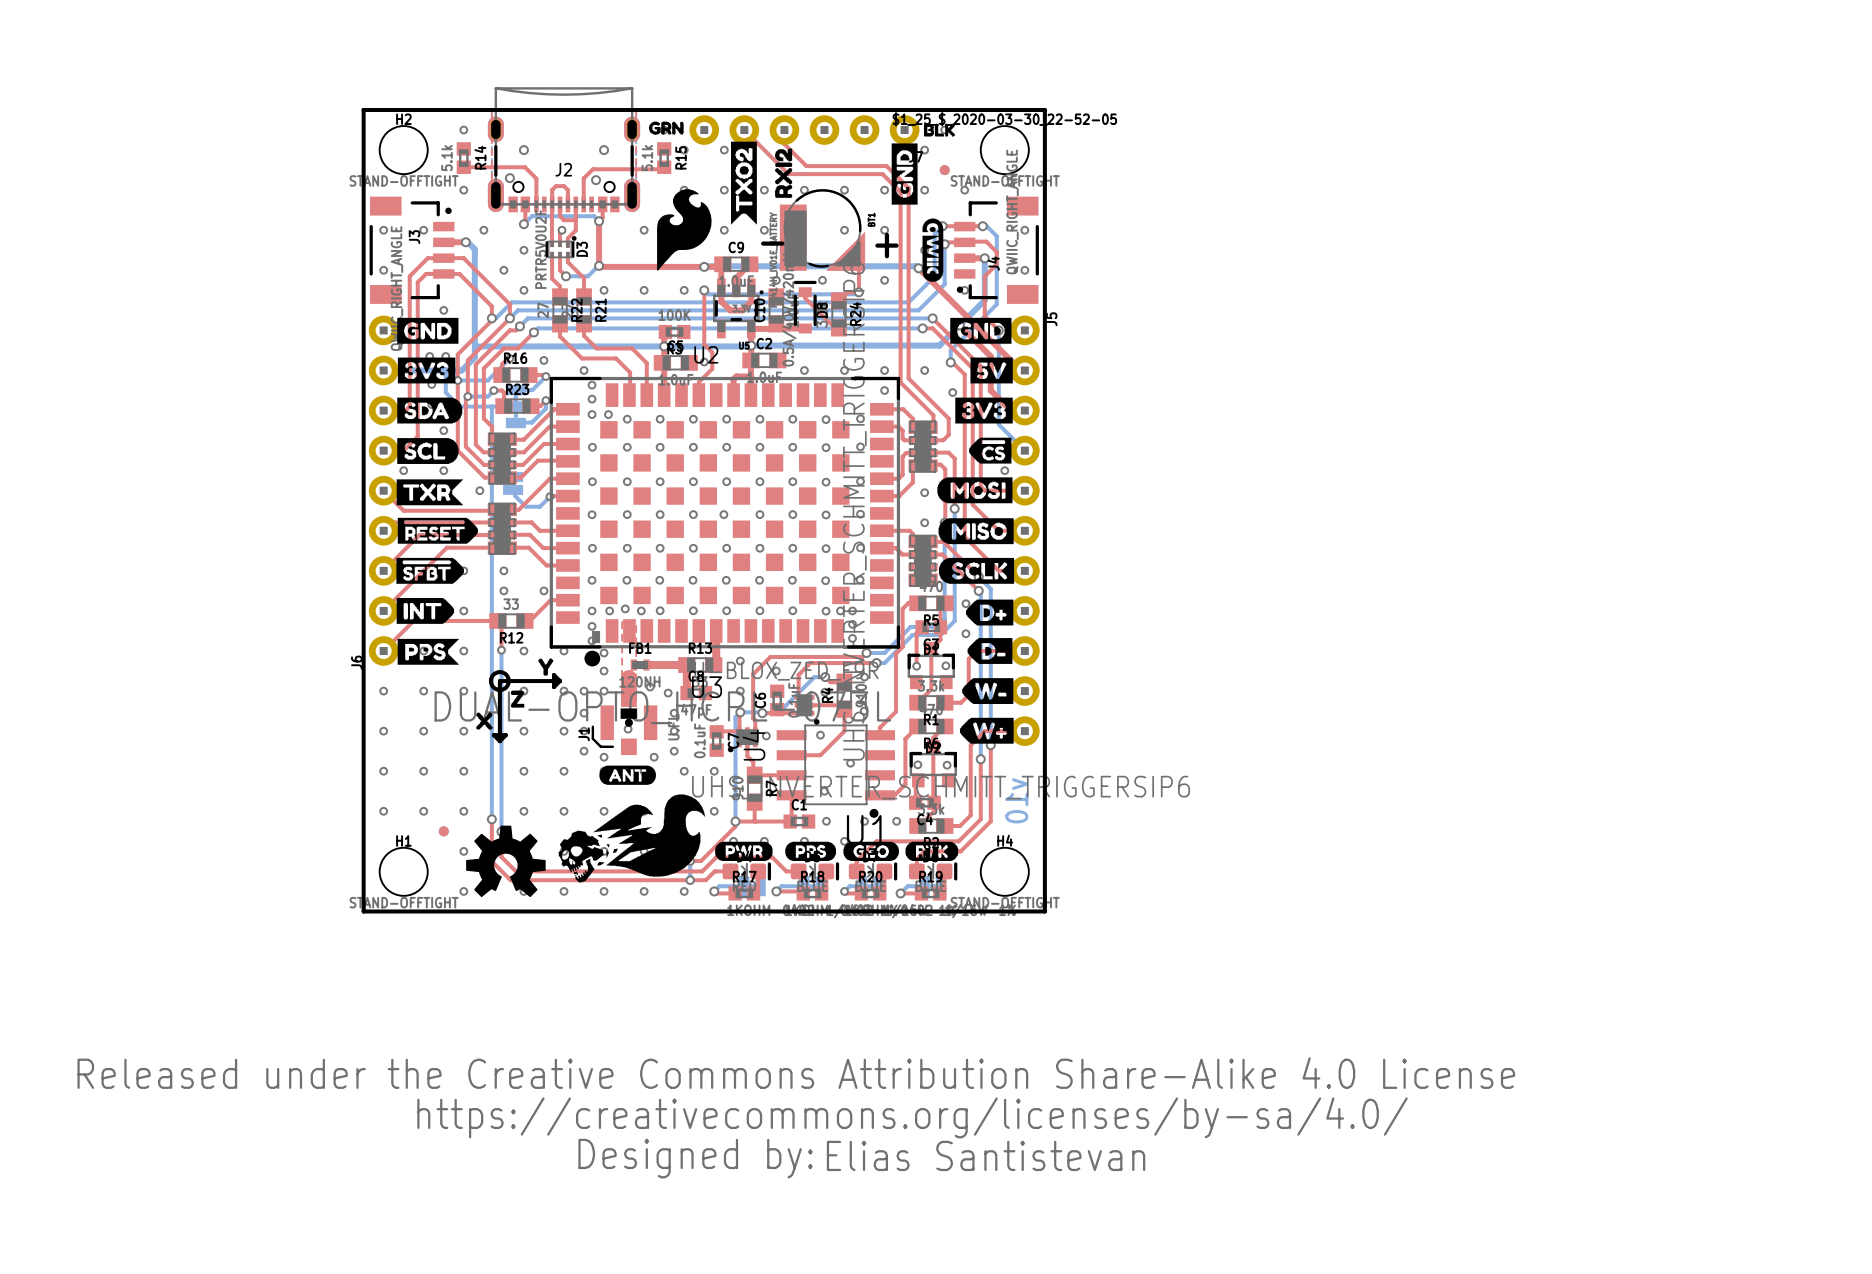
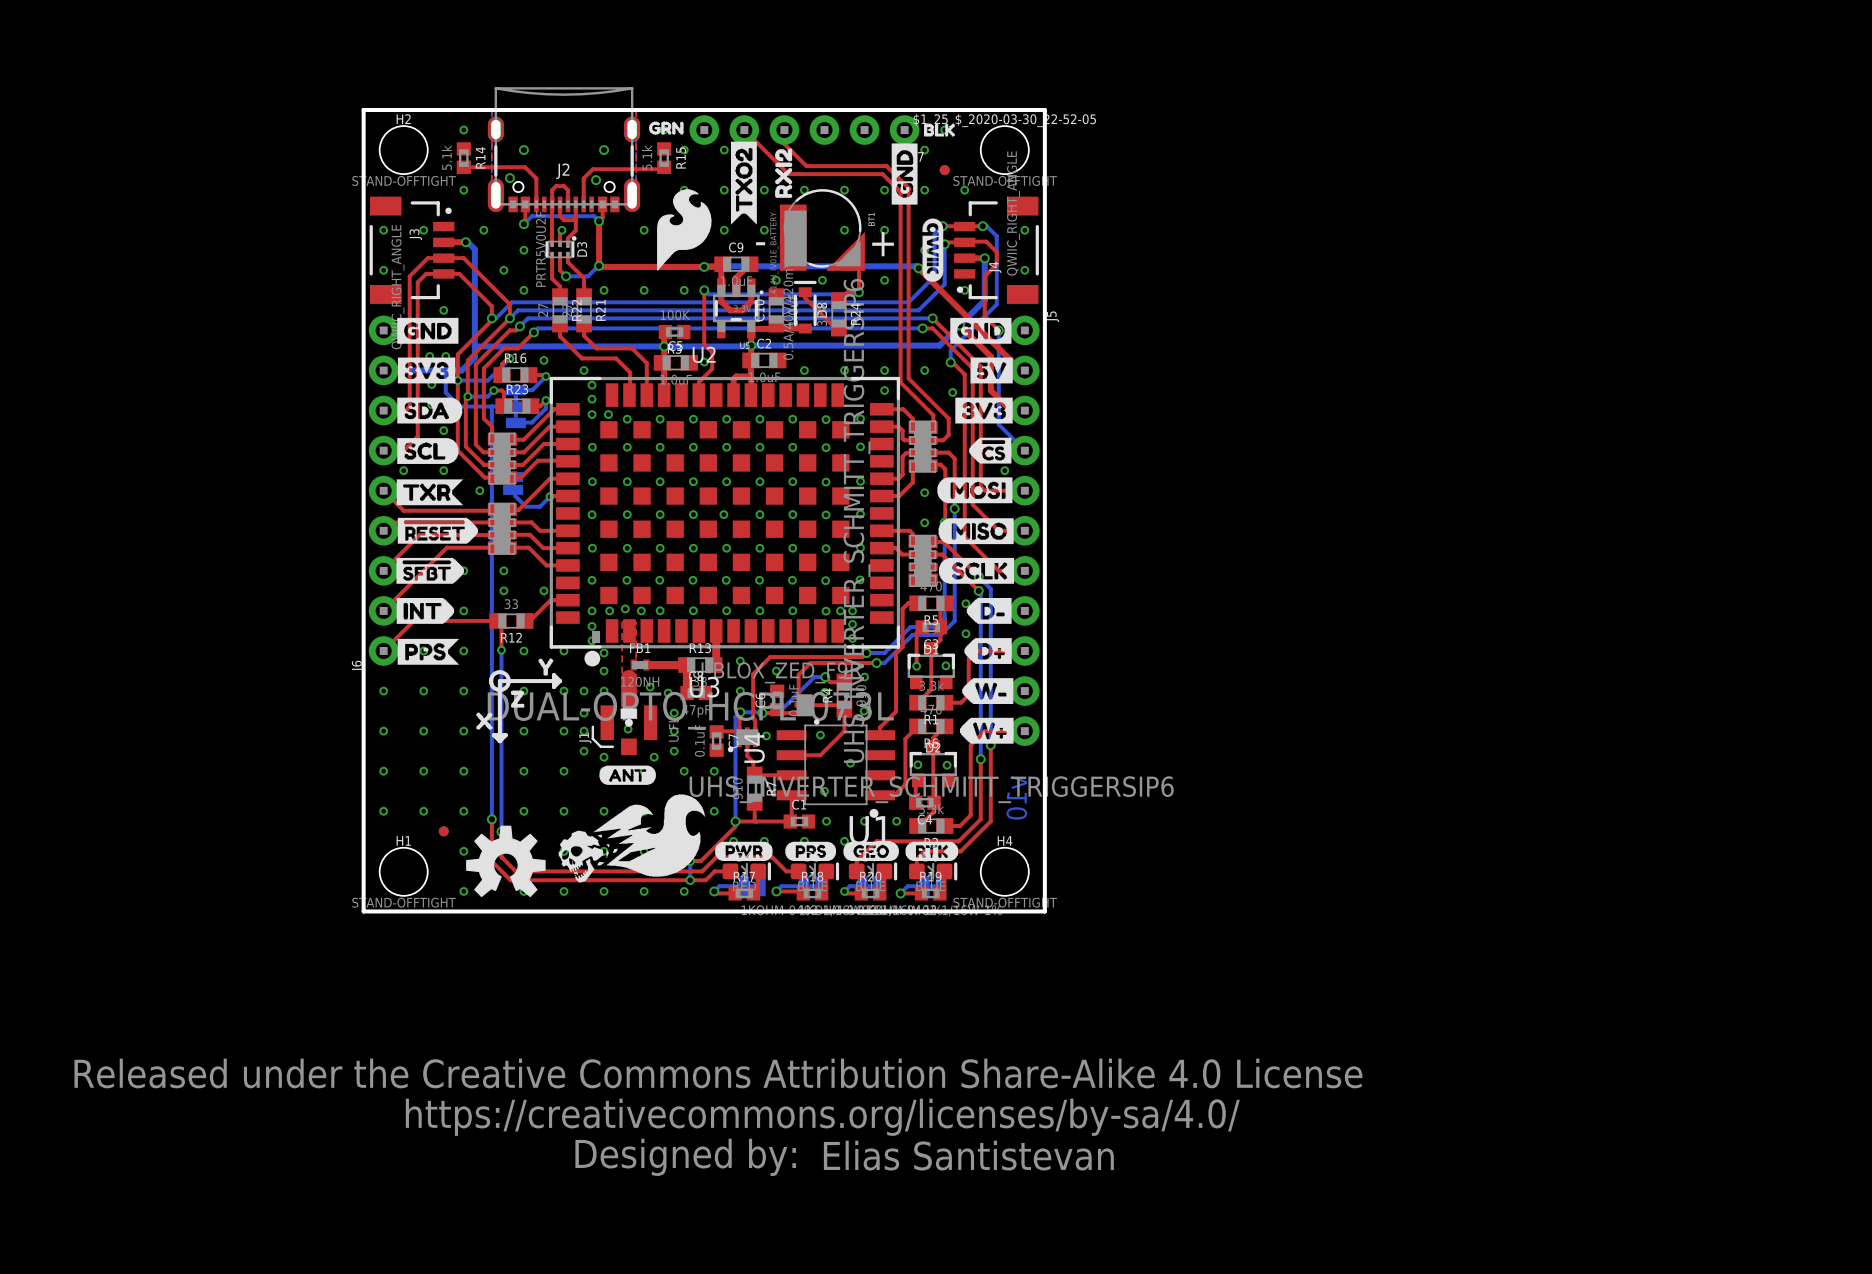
drawing position: (989, 612) -> (988, 651)
drawing position: (990, 651) -> (989, 610)

